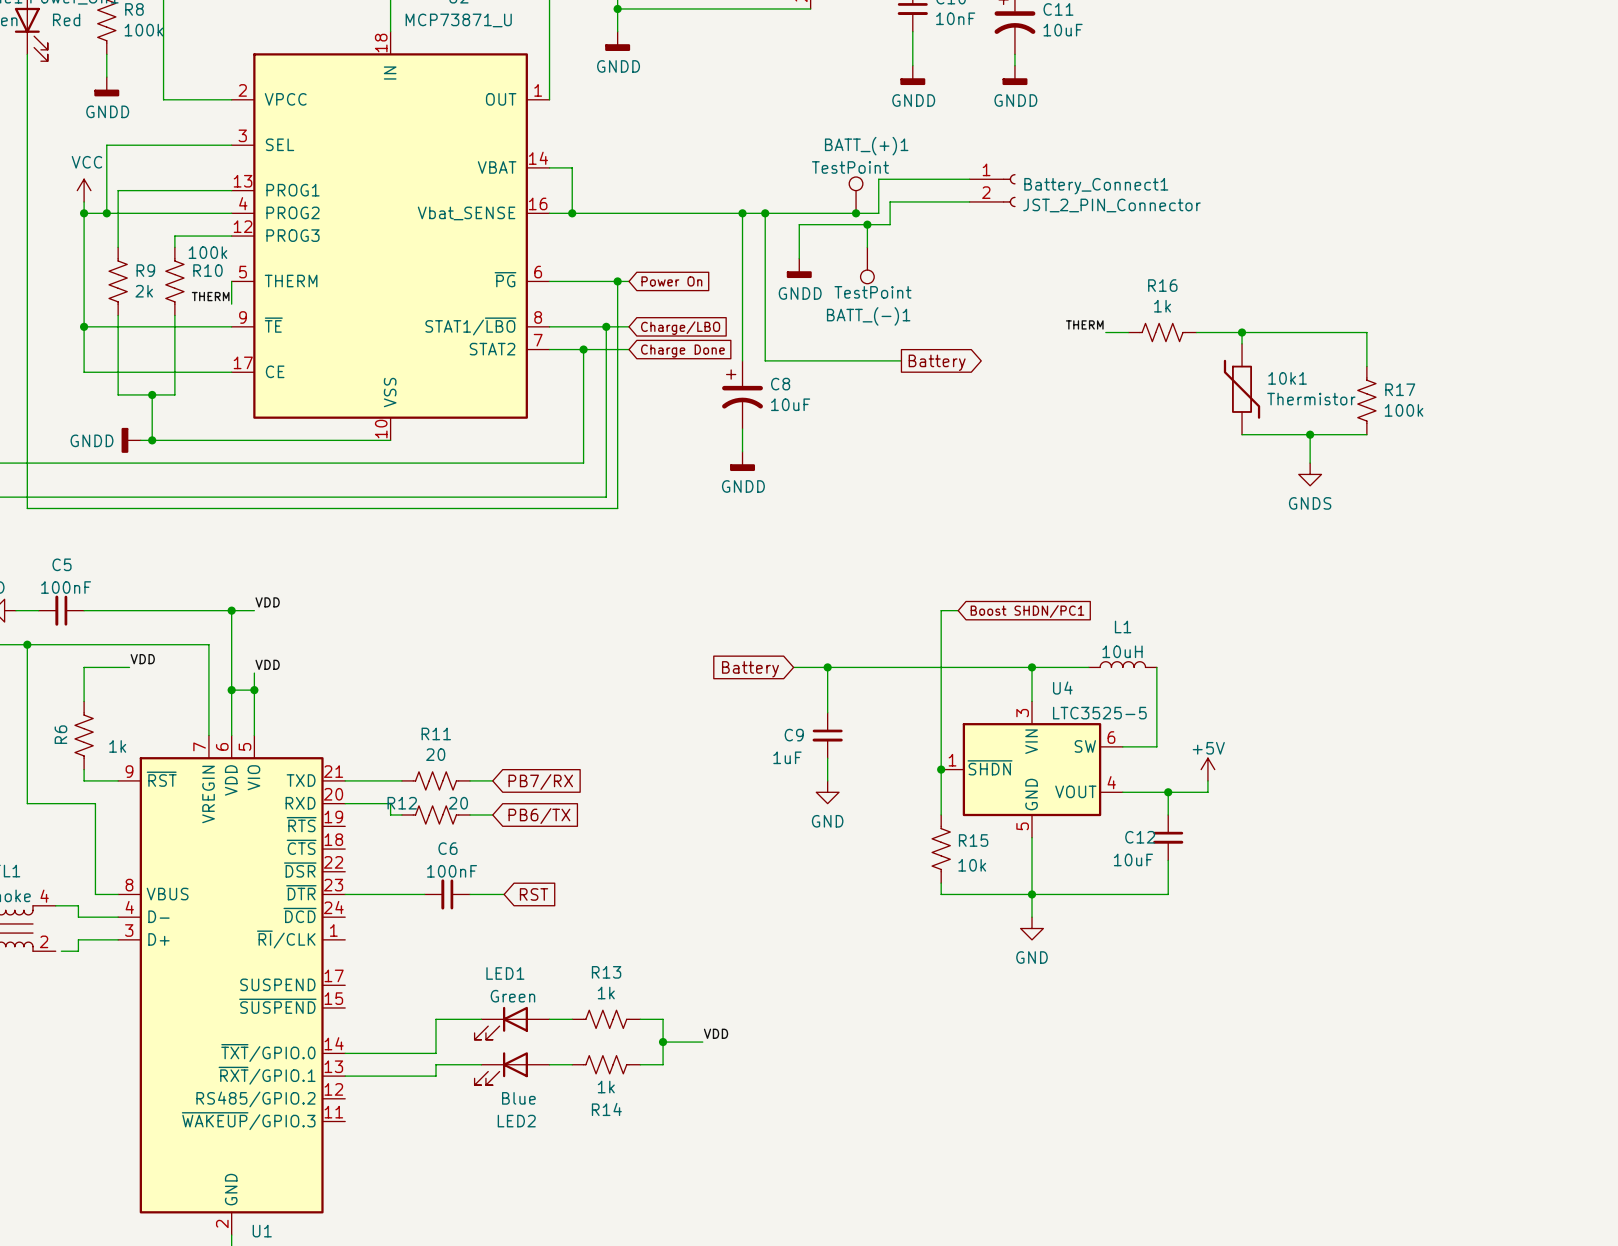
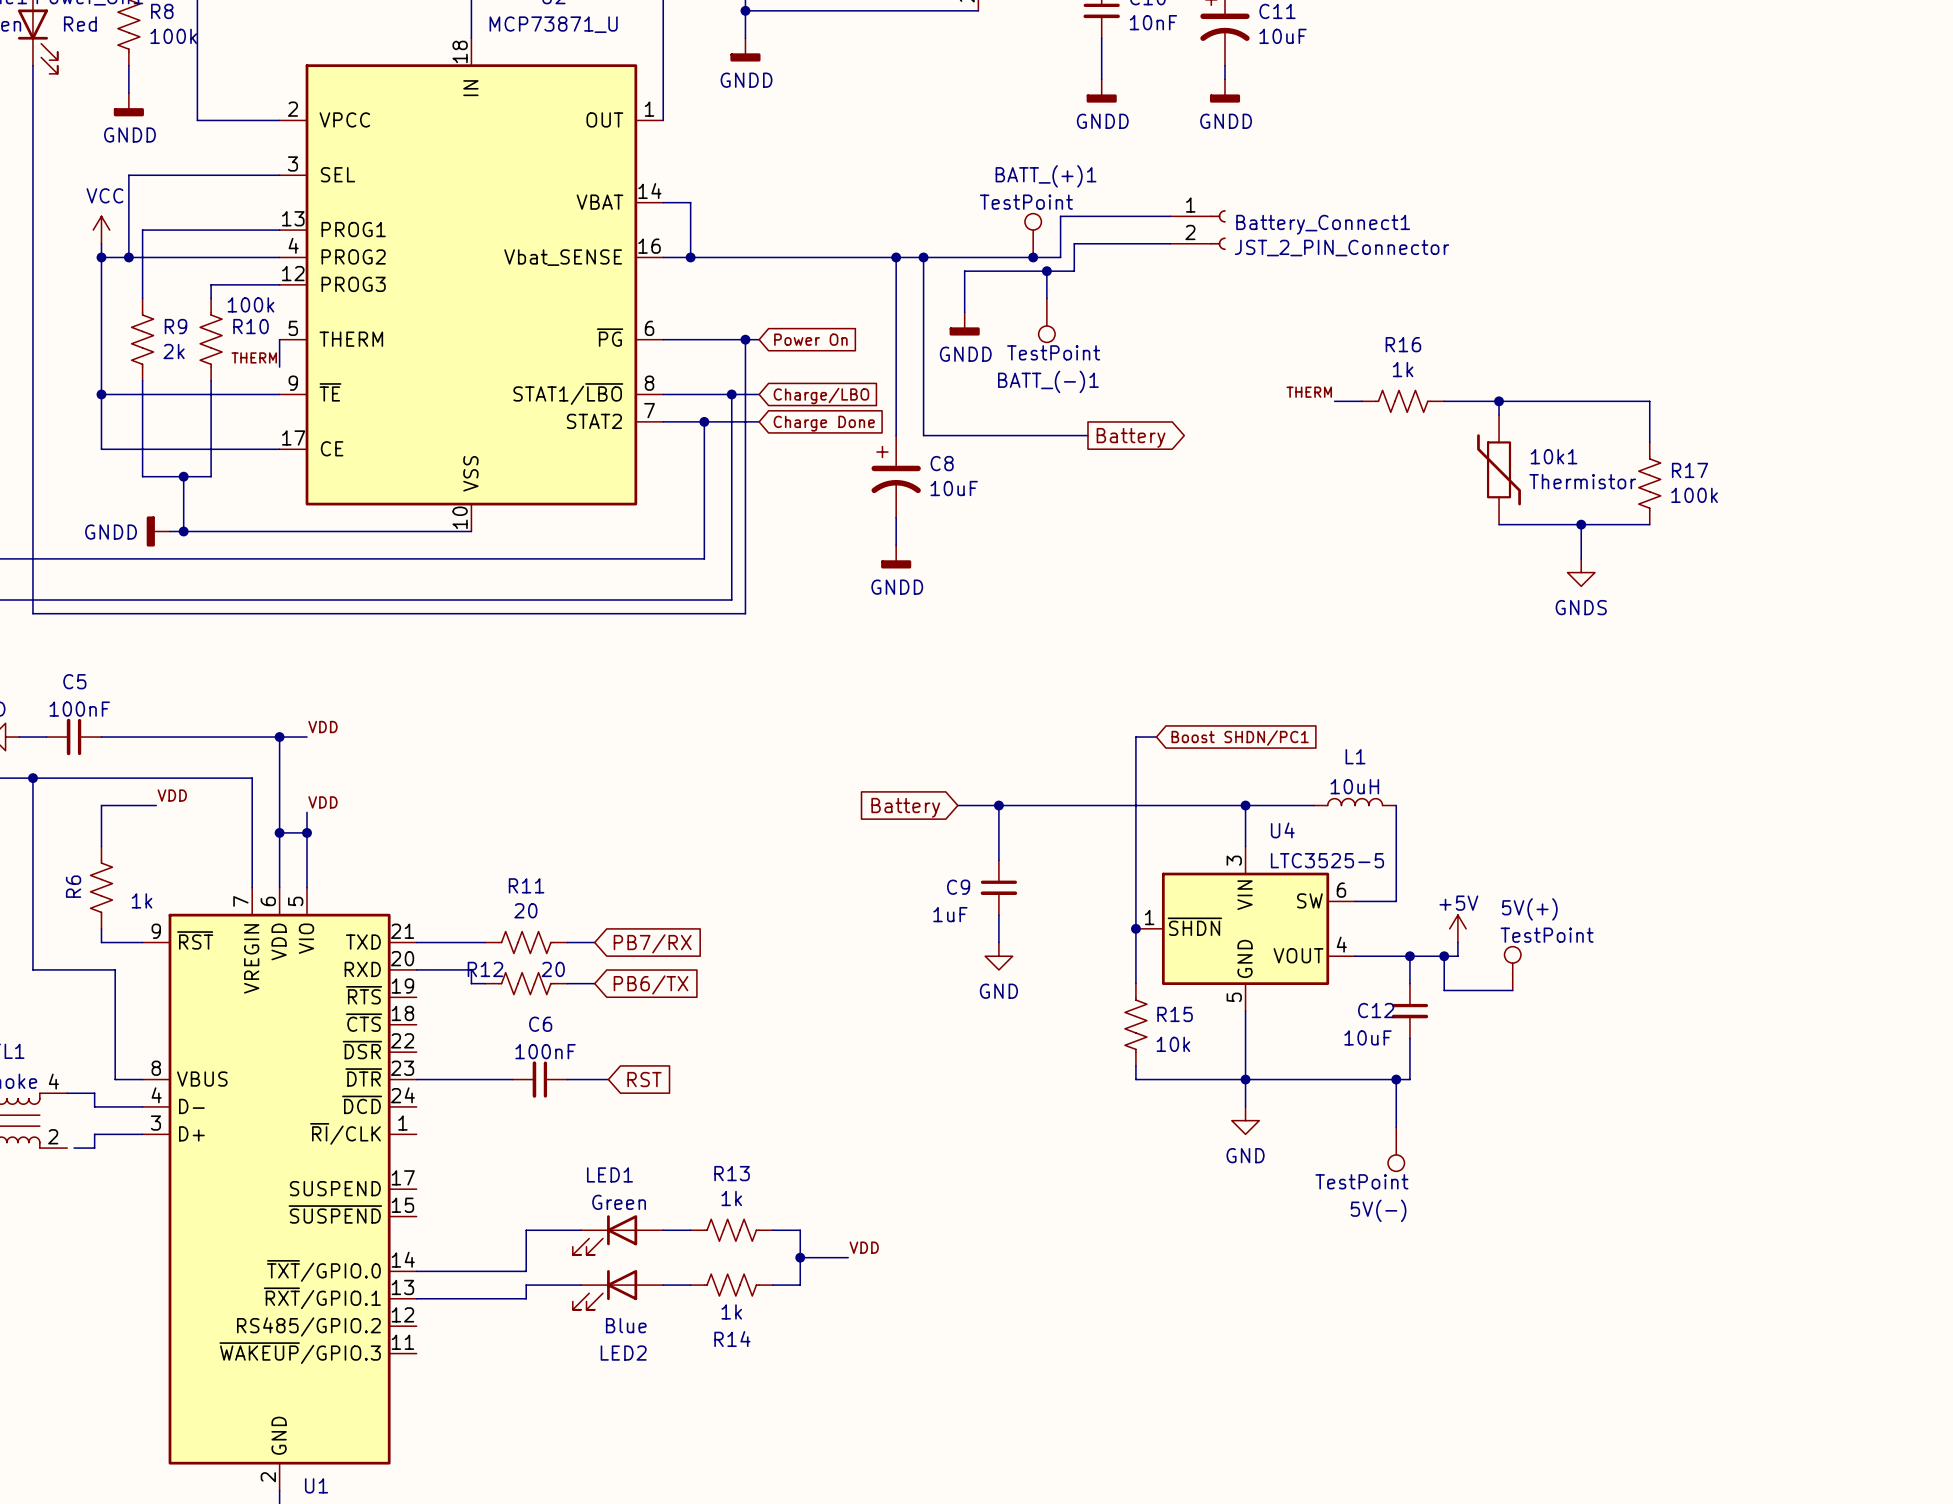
wire: none -> (1444, 956) (1444, 990) (1512, 990)
junction: none -> (1444, 956)
5V(+): none -> TestPoint (1512, 968)
wire: none -> (1396, 1079) (1396, 1127)
junction: none -> (1396, 1079)
5V(-): none -> TestPoint (1396, 1149)

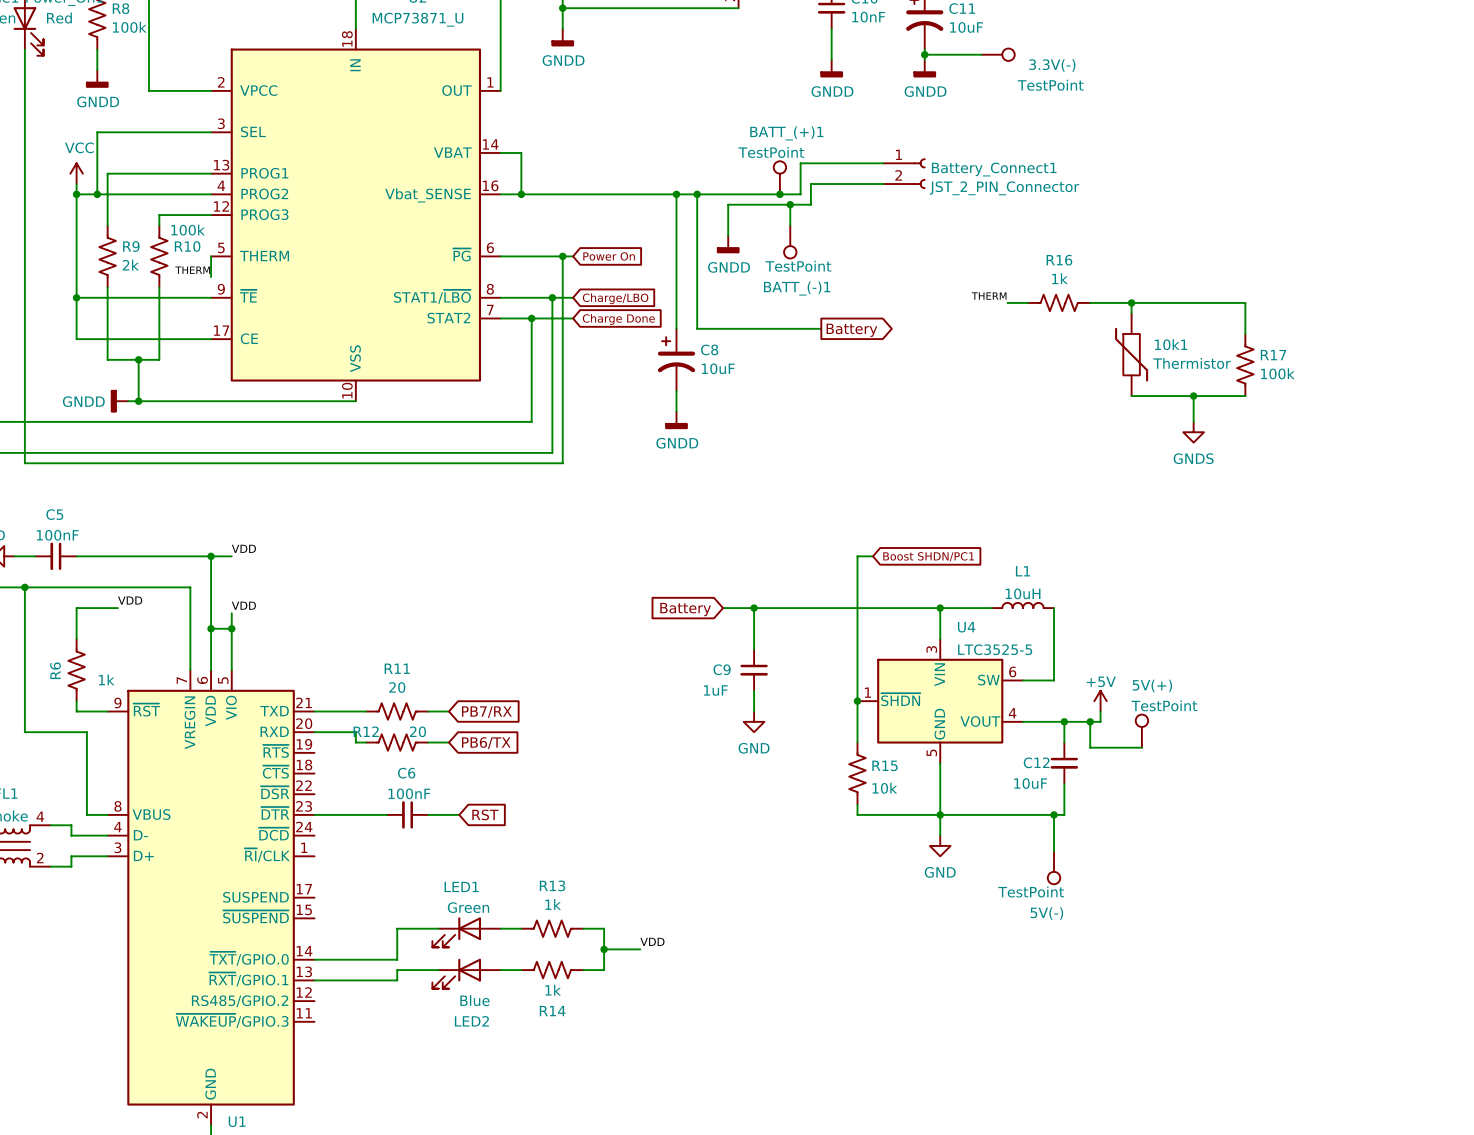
wire: none -> (924, 54) (981, 54)
junction: none -> (924, 54)
3.3V(-): none -> TestPoint (998, 54)
wire: none -> (50, 866) (55, 866)

